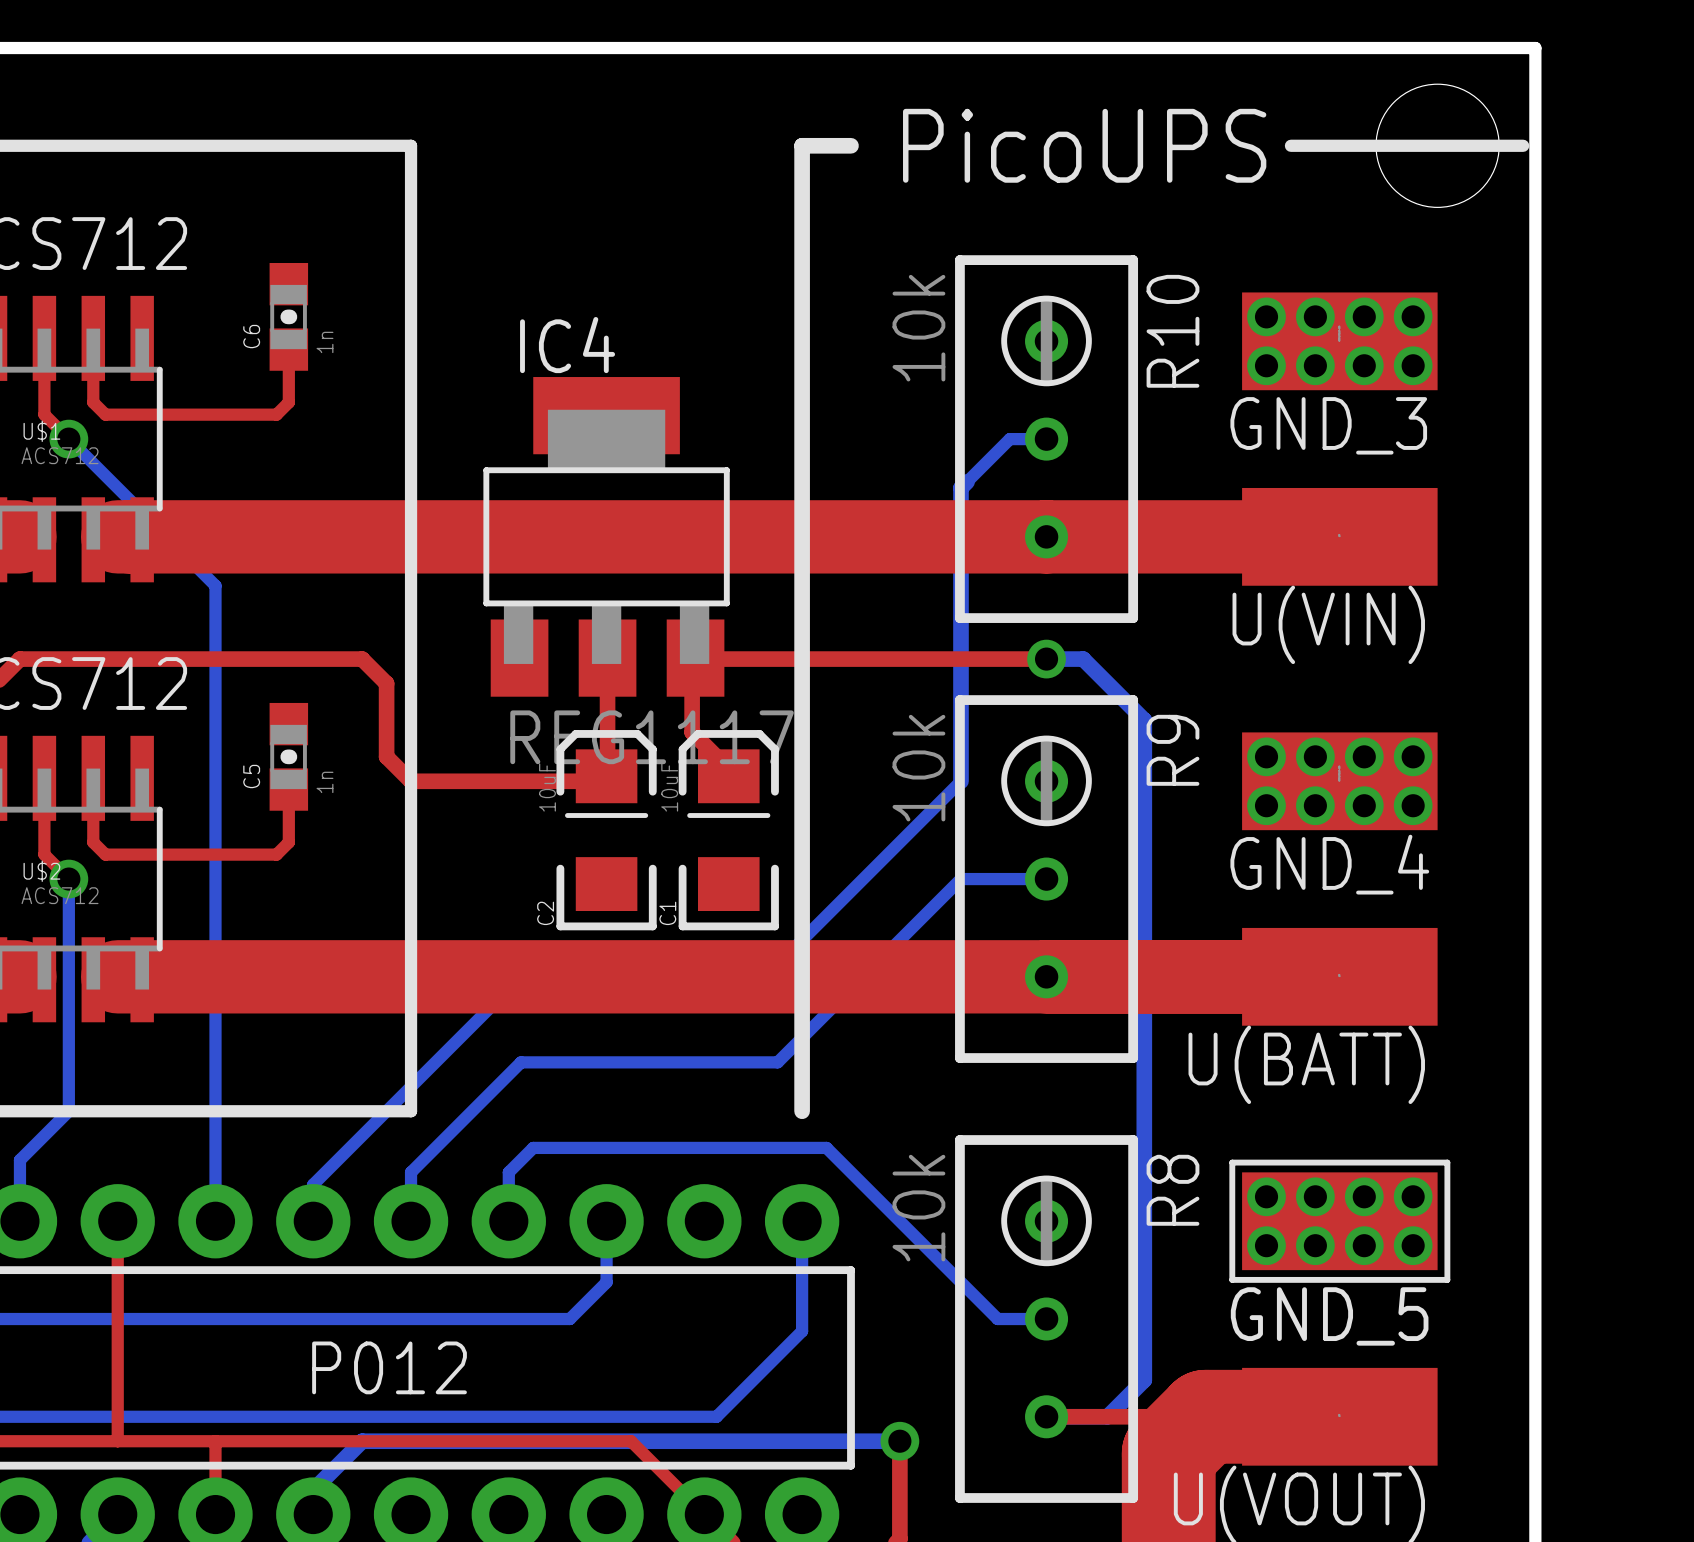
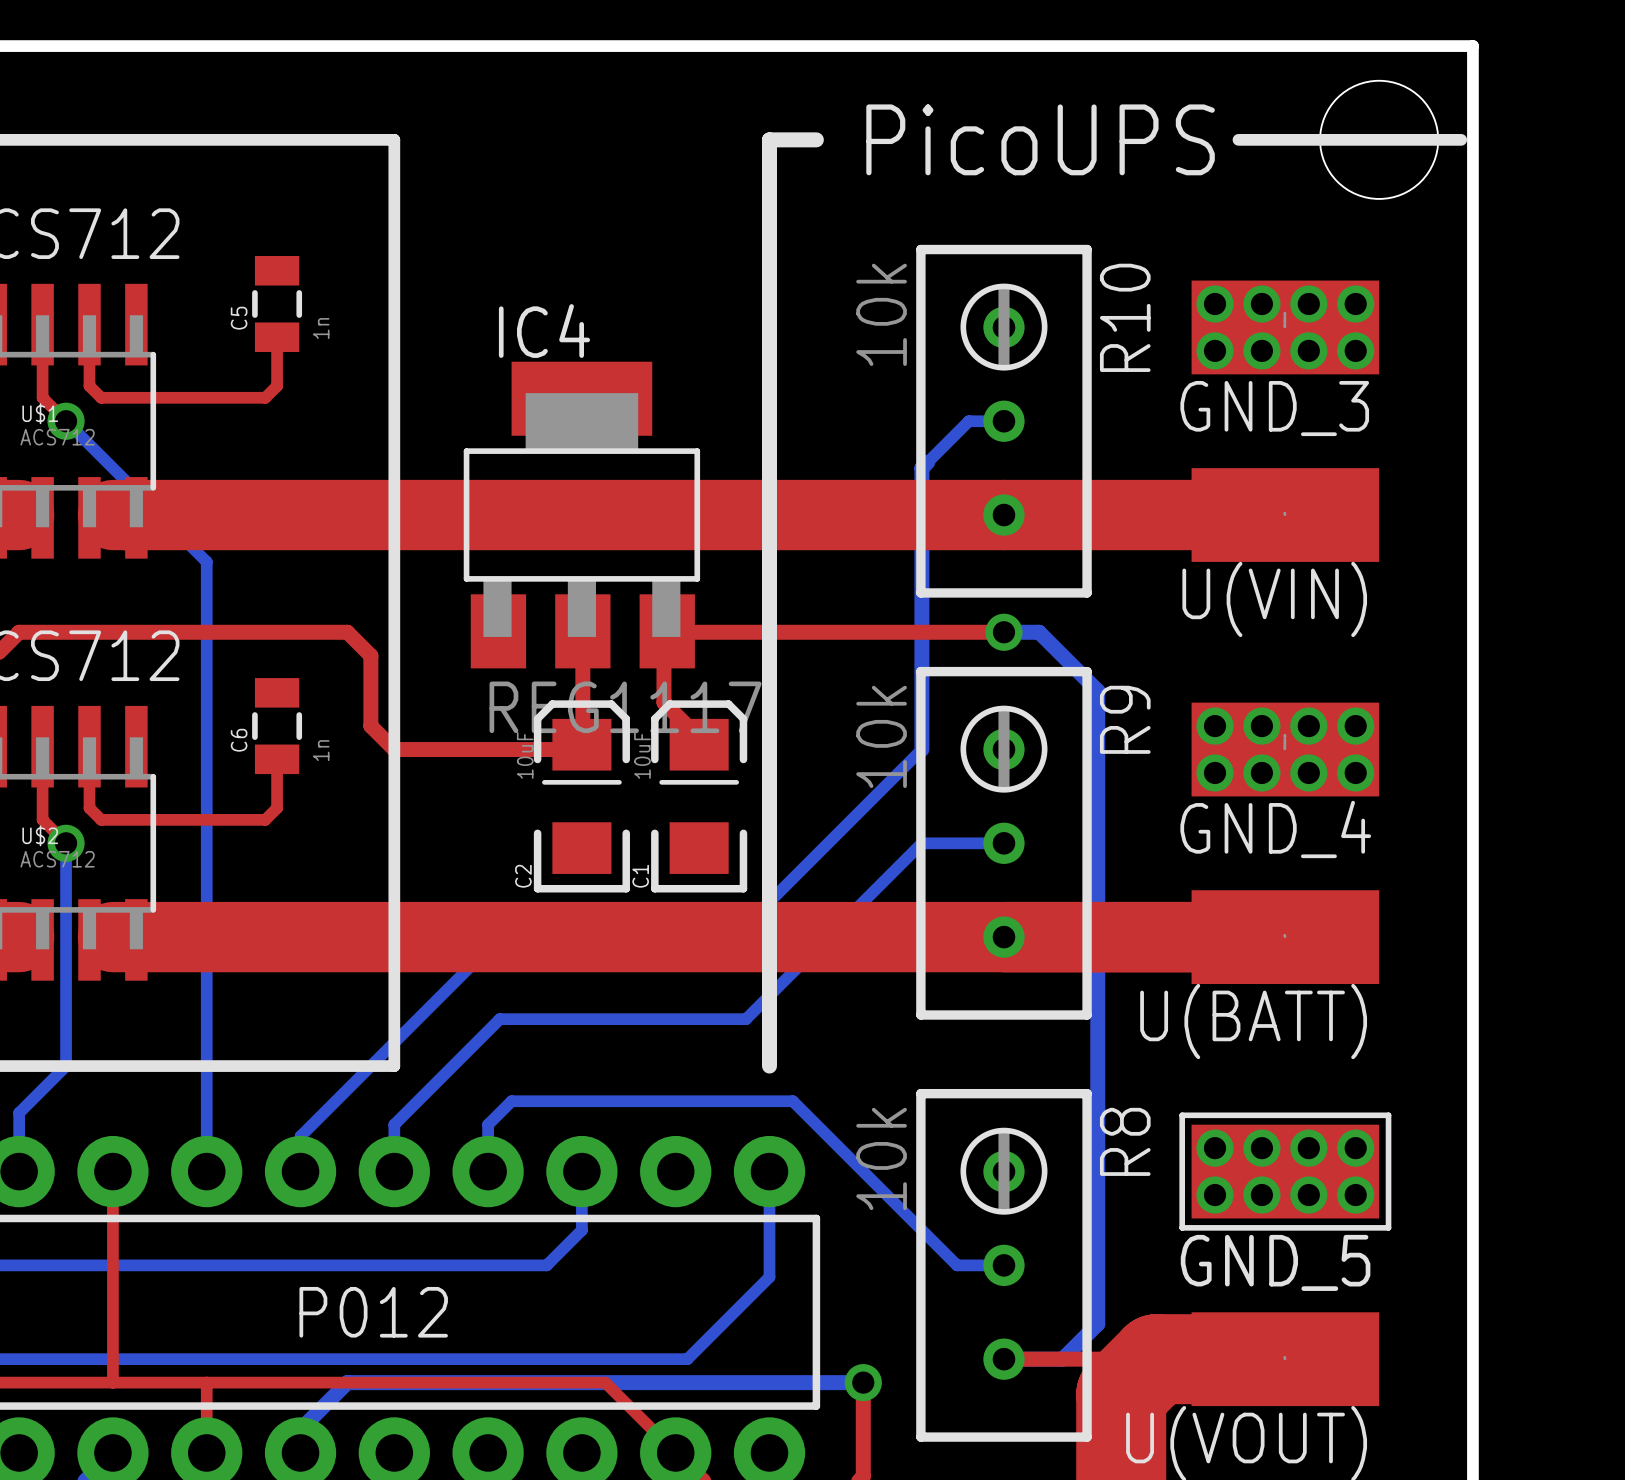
C6 footprint: [269, 263, 309, 371] -> [252, 678, 303, 775]
C5 footprint: [269, 702, 309, 811] -> [252, 255, 303, 353]

